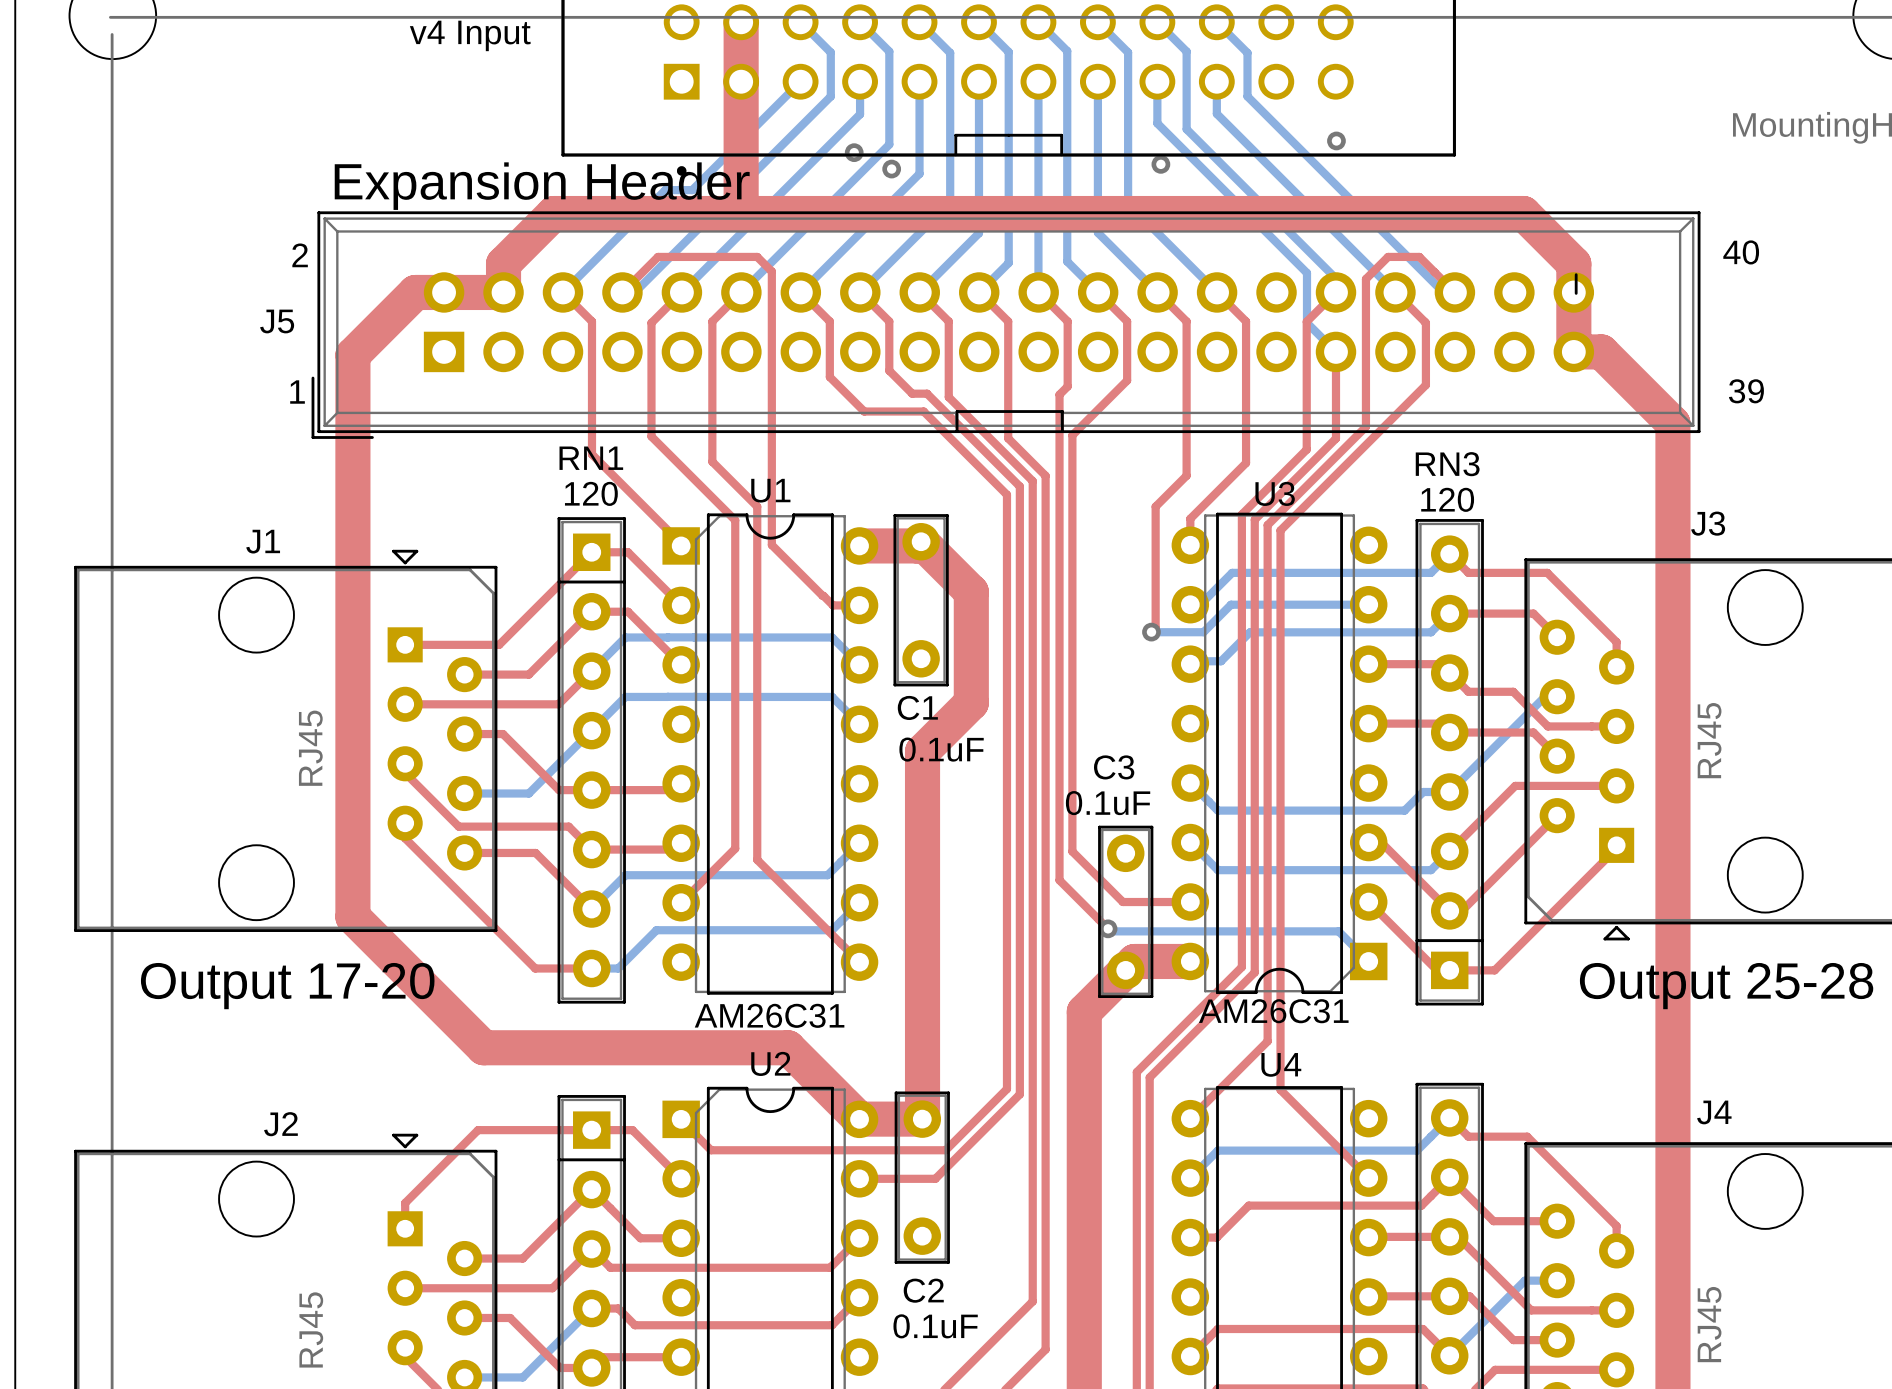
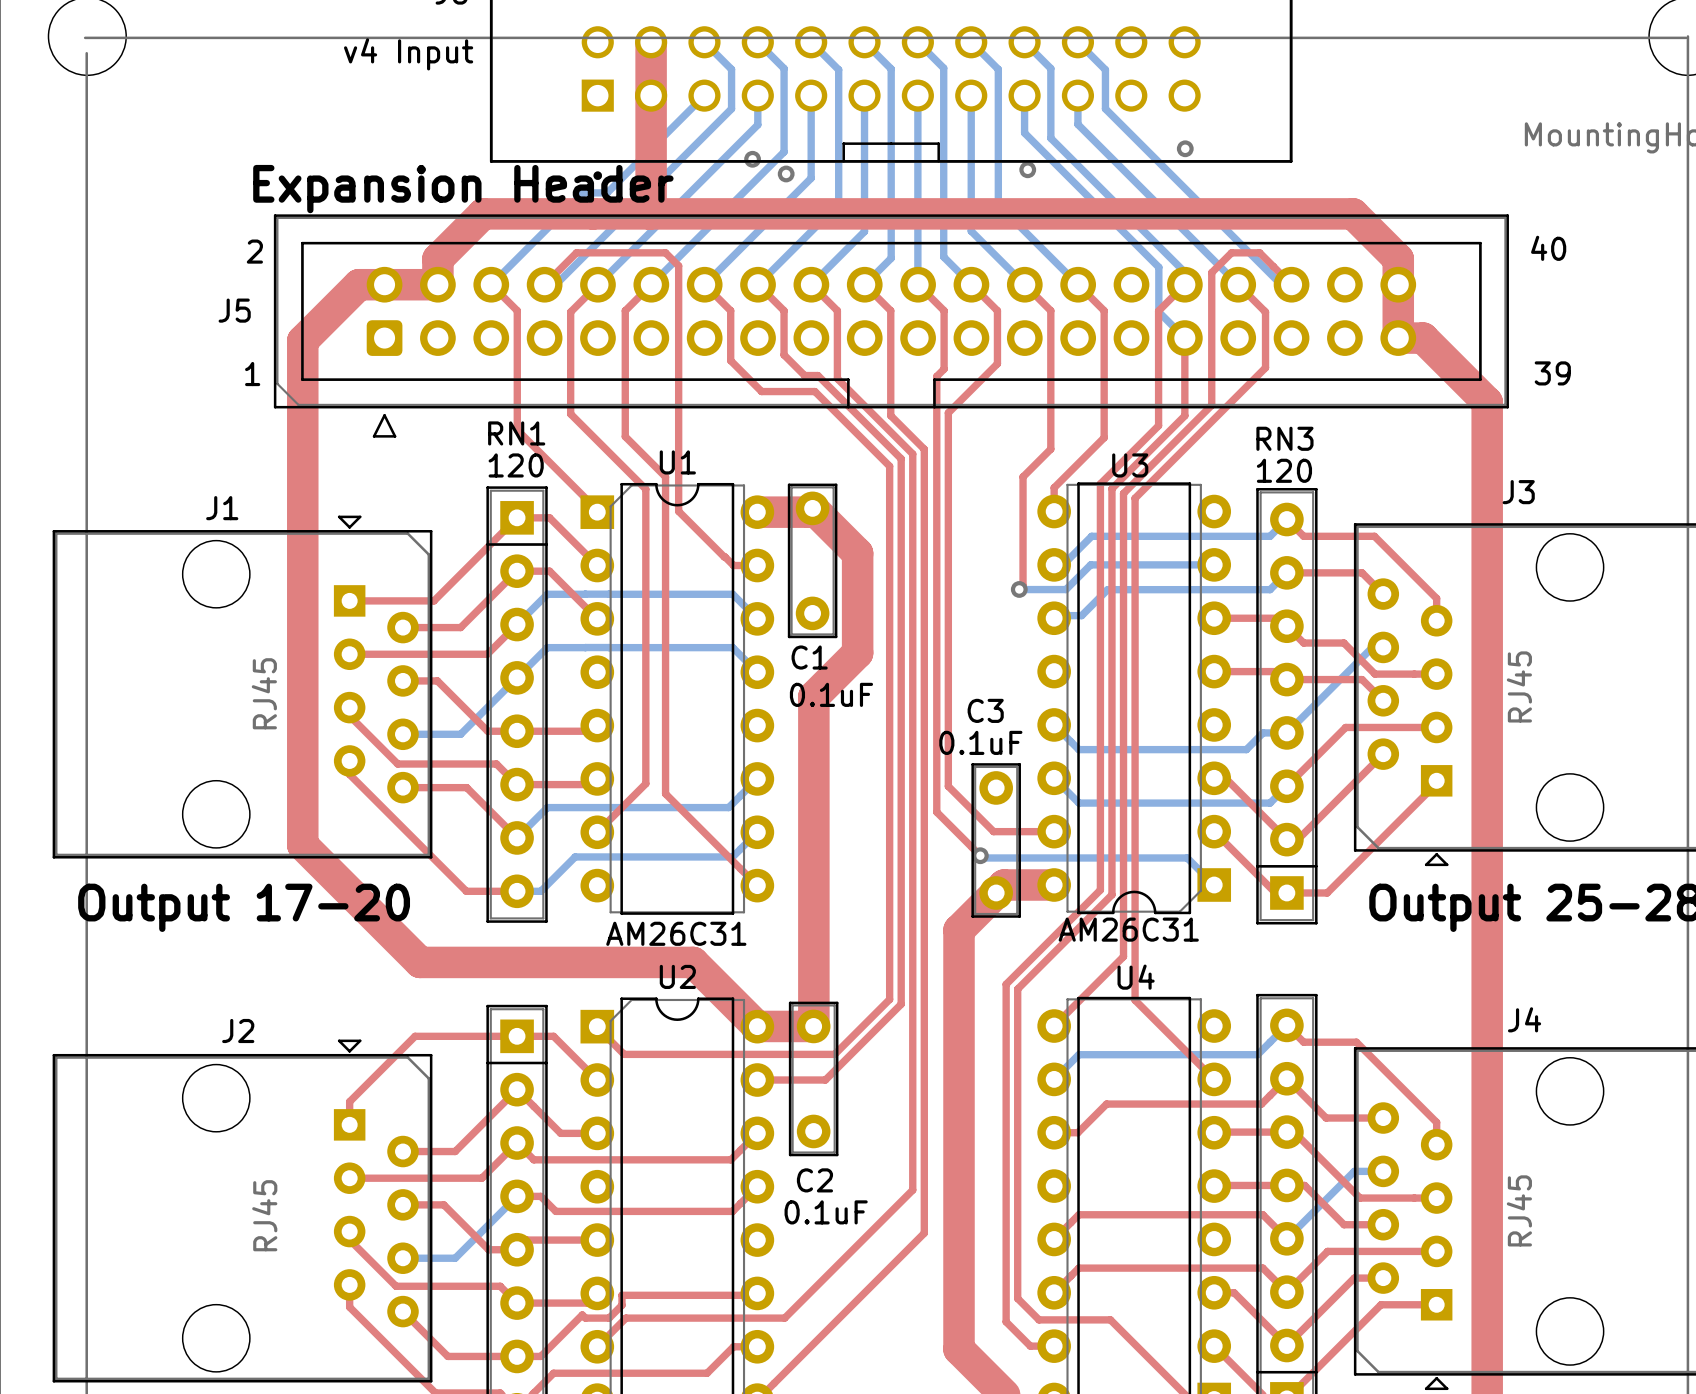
J5 footprint: [311, 211, 1701, 439] -> [273, 214, 1509, 438]
line: (1576, 274) (1576, 293) -> none
line: (957, 430) (957, 411) (1062, 411) (1062, 430) -> none

